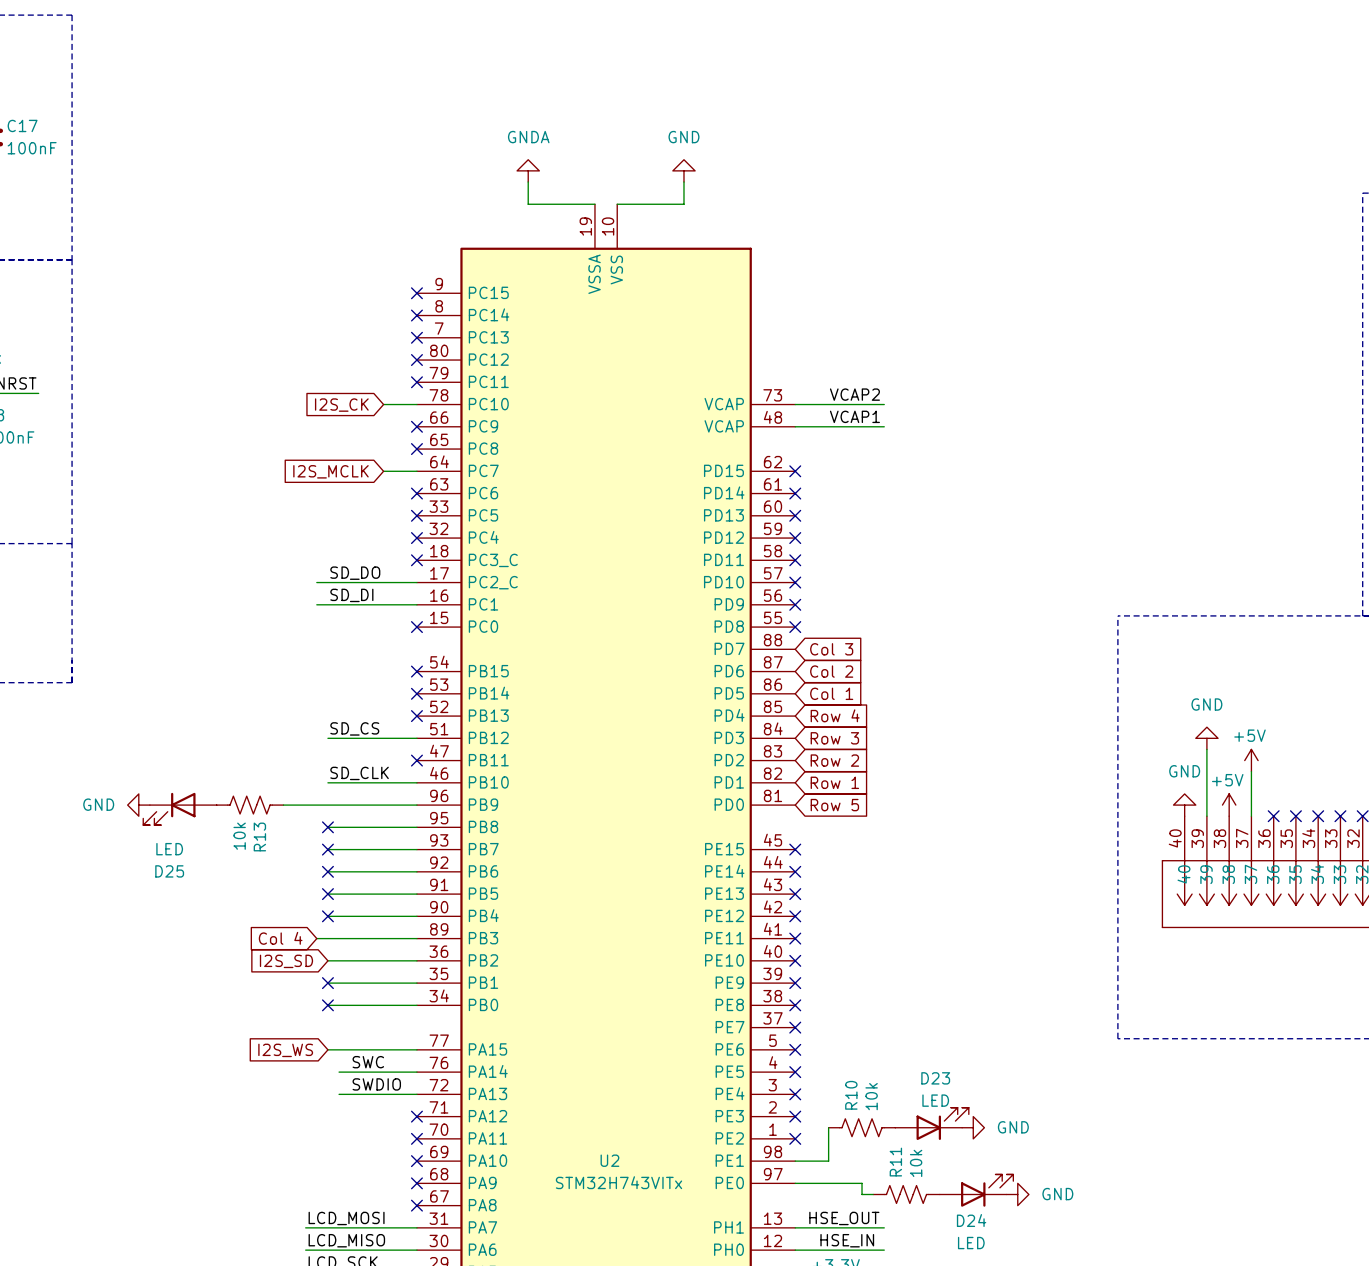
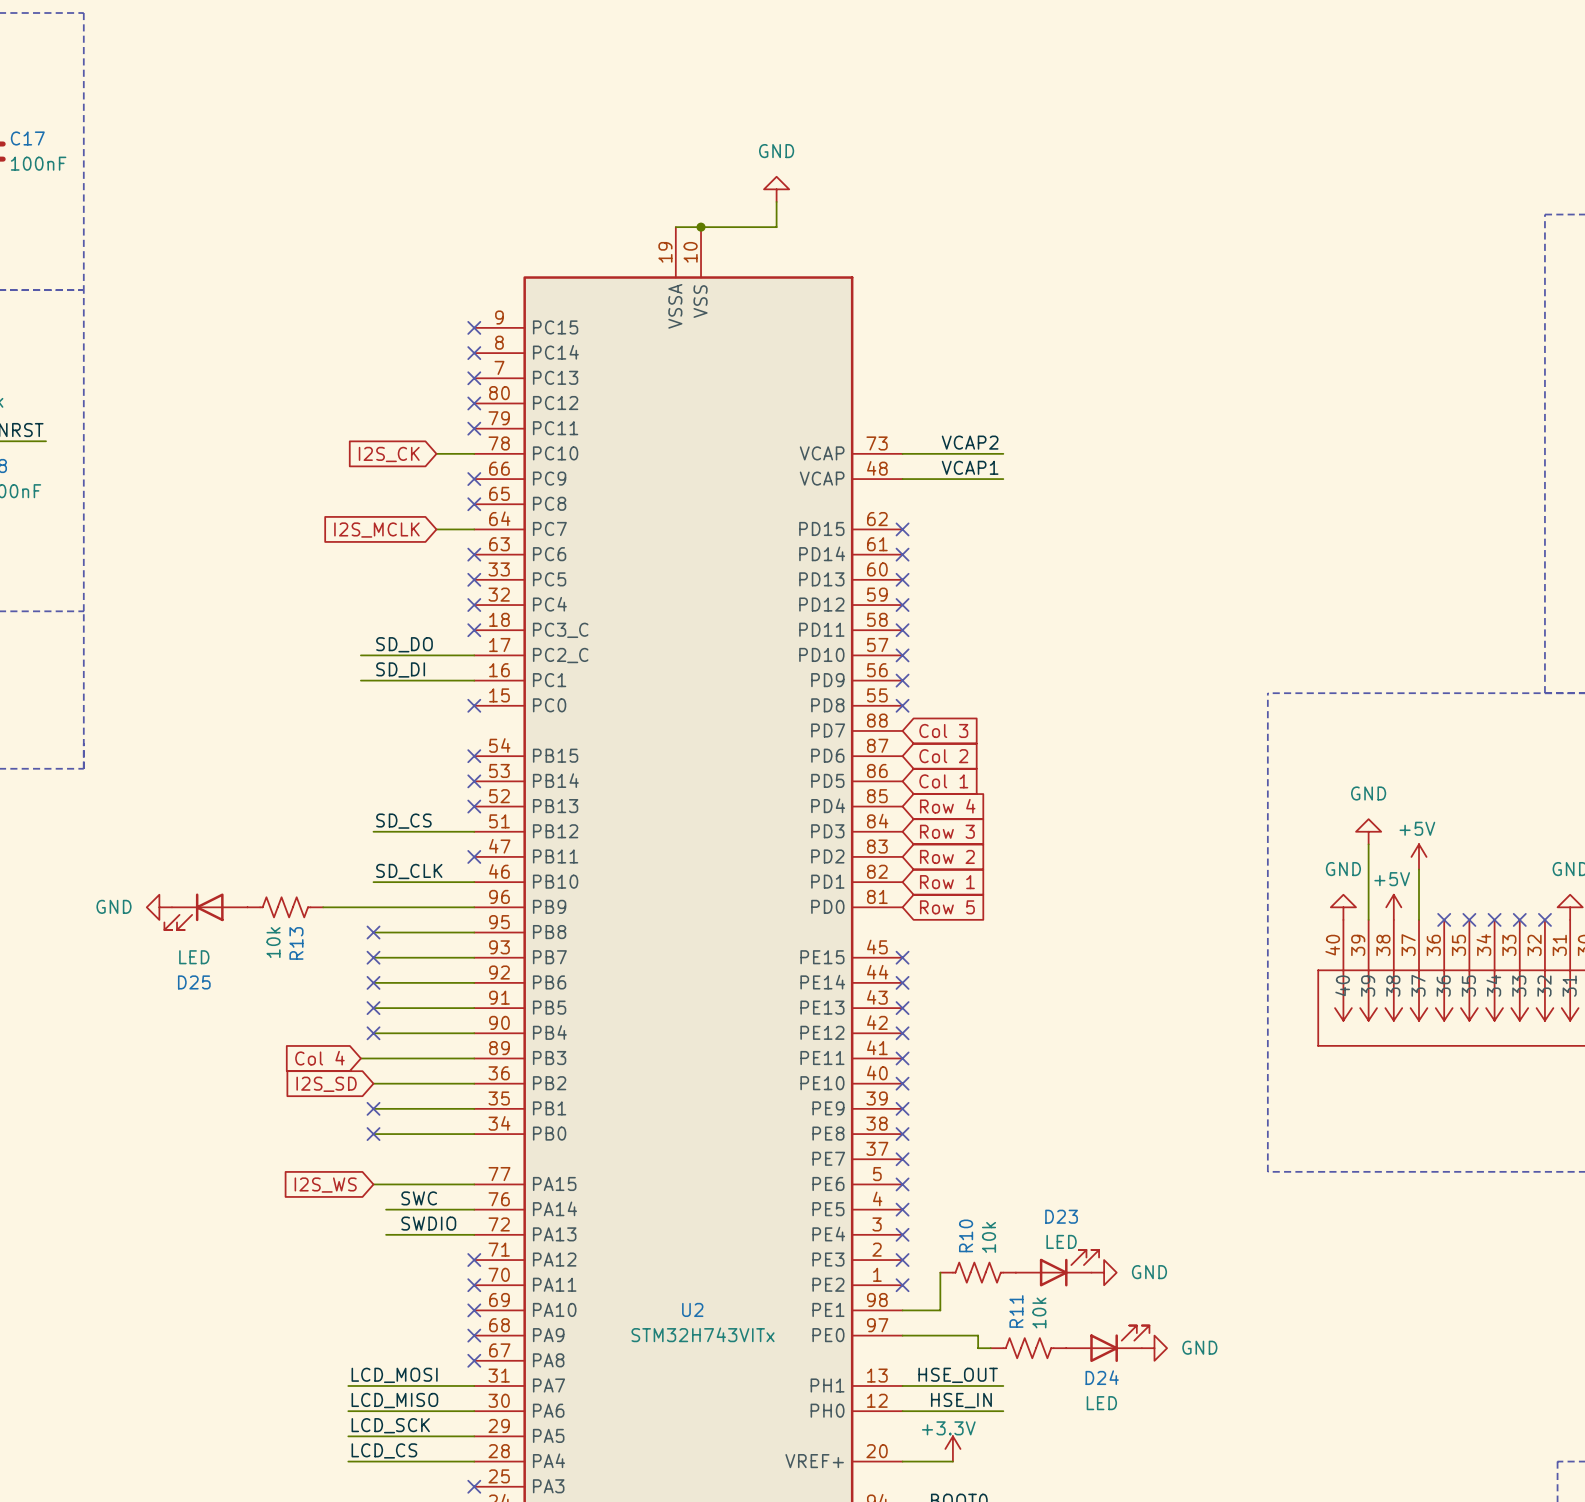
power symbol: GNDA (528, 170) -> none
wire: (528, 182) (528, 204) (594, 204) -> (701, 227) (675, 227)
junction: none -> (701, 227)

